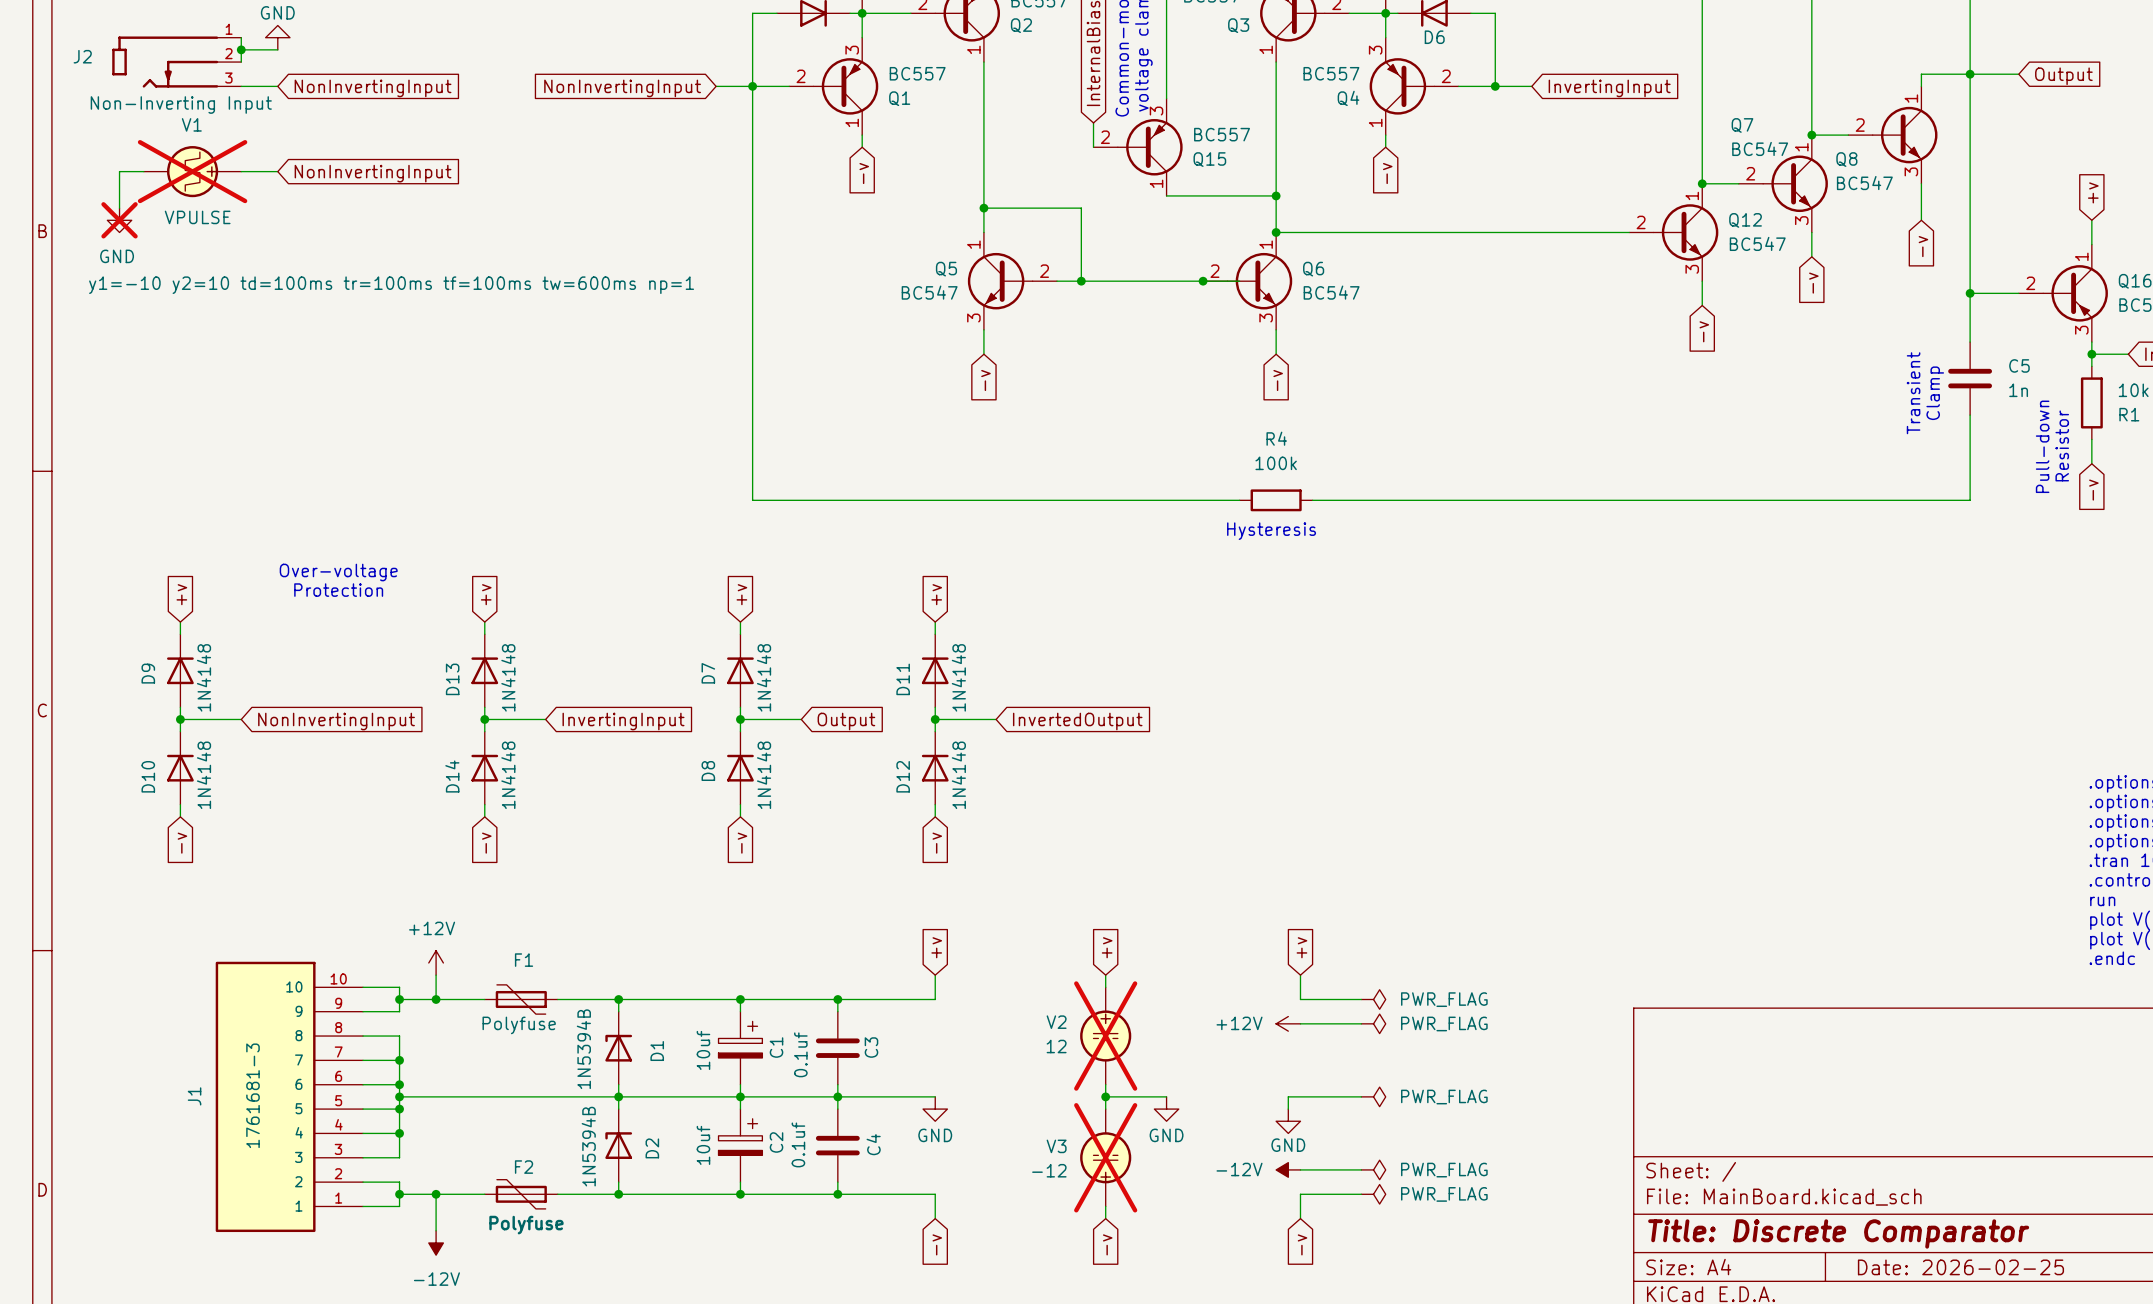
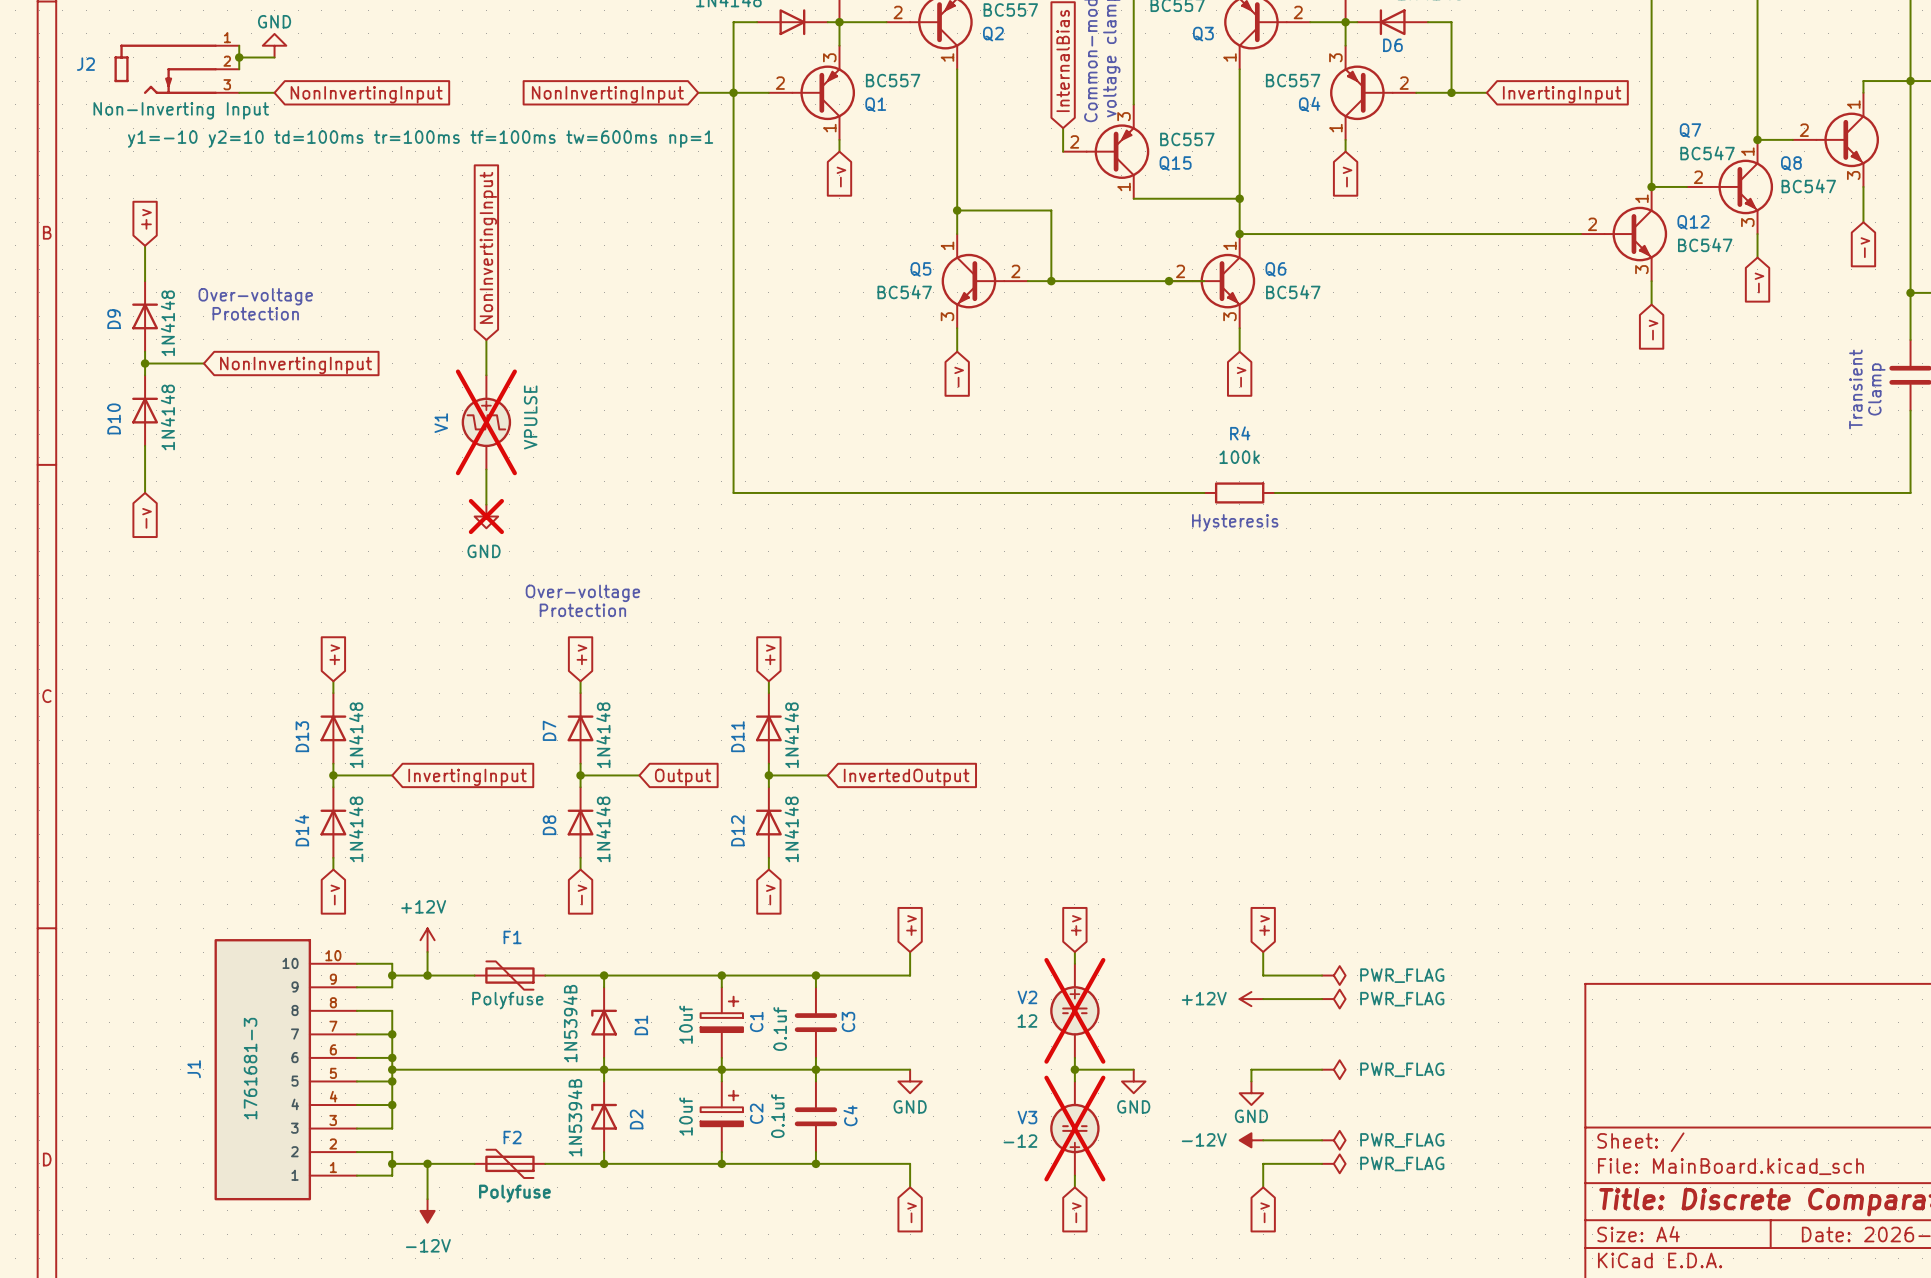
wire: (143, 171) (119, 171) (119, 208) -> none
V1 rotation: 0° (192, 171) -> 90° counterclockwise (486, 422)
V1 position: (192, 171) -> (486, 422)
wire: (241, 171) (277, 171) -> none
global label: NonInvertingInput (373, 173) -> none
global label: none -> +v (146, 219)
power symbol: GND (119, 220) -> none
wire: none -> (145, 245) (145, 281)
global label: none -> NonInvertingInput (488, 247)
V1 text position: y1=-10 y2=10 td=100ms tr=100ms tf=100ms tw=600ms np=1 (391, 285) -> y1=-10 y2=10 td=100ms tr=100ms tf=100ms tw=600ms np=1 (420, 139)
text: none -> Over-voltage (255, 296)
text: none -> Protection (255, 313)
wire: none -> (486, 339) (486, 375)
wire: none -> (145, 351) (145, 375)
wire: none -> (145, 363) (203, 363)
junction: none -> (145, 363)
global label: none -> NonInvertingInput (296, 365)
wire: none -> (145, 445) (145, 492)
wire: none -> (486, 469) (486, 504)
power symbol: none -> GND (486, 516)
global label: none -> -v (147, 518)
text: Over-voltage (338, 572) -> none
text: Protection (338, 590) -> none
global label: +v (181, 594) -> none
global label: +v (486, 594) -> none
global label: +v (741, 594) -> none
global label: +v (936, 594) -> none
text: none -> Over-voltage (582, 593)
text: none -> Protection (582, 610)
wire: (180, 622) (180, 634) -> none
wire: (484, 622) (484, 634) -> (333, 681) (333, 693)
wire: (740, 622) (740, 634) -> (580, 681) (580, 693)
wire: (935, 622) (935, 634) -> (768, 681) (768, 693)
global label: none -> +v (334, 654)
global label: none -> +v (581, 654)
global label: none -> +v (770, 654)
D9 position: (180, 670) -> (145, 316)
D13 position: (484, 670) -> (333, 728)
D7 position: (740, 670) -> (580, 728)
D11 position: (935, 670) -> (768, 728)
wire: (180, 707) (180, 731) -> none
wire: (484, 707) (484, 731) -> (333, 763) (333, 787)
wire: (740, 707) (740, 731) -> (580, 763) (580, 787)
wire: (935, 707) (935, 731) -> (768, 763) (768, 787)
wire: (180, 719) (241, 719) -> none
junction: (180, 719) -> none
wire: (484, 719) (545, 719) -> (333, 775) (392, 775)
junction: (484, 719) -> none
wire: (740, 719) (801, 719) -> (580, 775) (639, 775)
junction: (740, 719) -> none
wire: (935, 719) (996, 719) -> (768, 775) (827, 775)
junction: (935, 719) -> none
global label: NonInvertingInput (336, 721) -> none
global label position: InvertingInput (623, 721) -> InvertingInput (467, 777)
global label position: Output (846, 721) -> Output (683, 777)
global label position: InvertedOutput (1077, 721) -> InvertedOutput (906, 777)
D10 position: (180, 768) -> (145, 410)
D14 position: (484, 768) -> (333, 822)
D8 position: (740, 768) -> (580, 822)
D12 position: (935, 768) -> (768, 822)
junction: none -> (333, 775)
junction: none -> (580, 775)
junction: none -> (768, 775)
wire: (180, 804) (180, 816) -> none
wire: (484, 804) (484, 816) -> (333, 857) (333, 869)
wire: (740, 804) (740, 816) -> (580, 857) (580, 869)
wire: (935, 804) (935, 816) -> (768, 857) (768, 869)
global label: -v (182, 843) -> none
global label: -v (486, 843) -> none
global label: -v (742, 843) -> none
global label: -v (937, 843) -> none
global label: none -> -v (335, 894)
global label: none -> -v (582, 894)
global label: none -> -v (770, 894)

